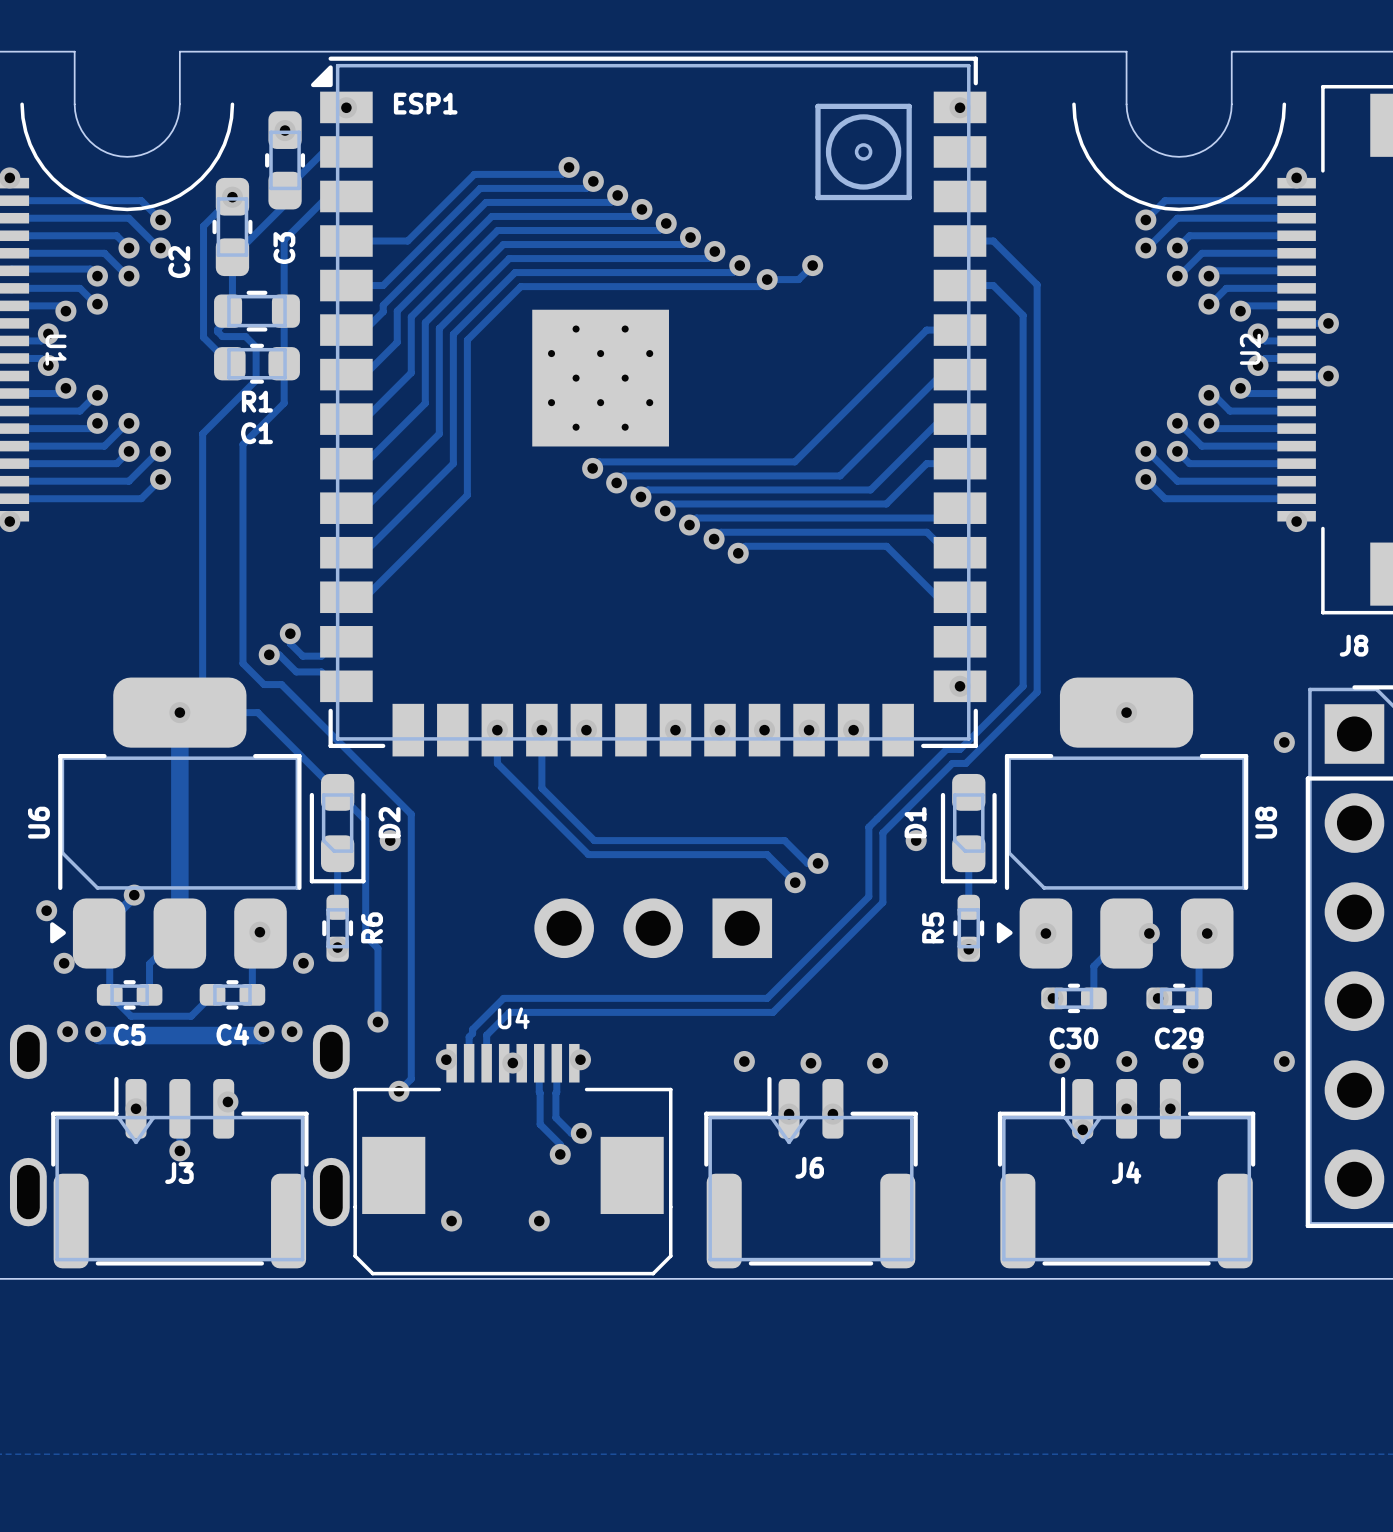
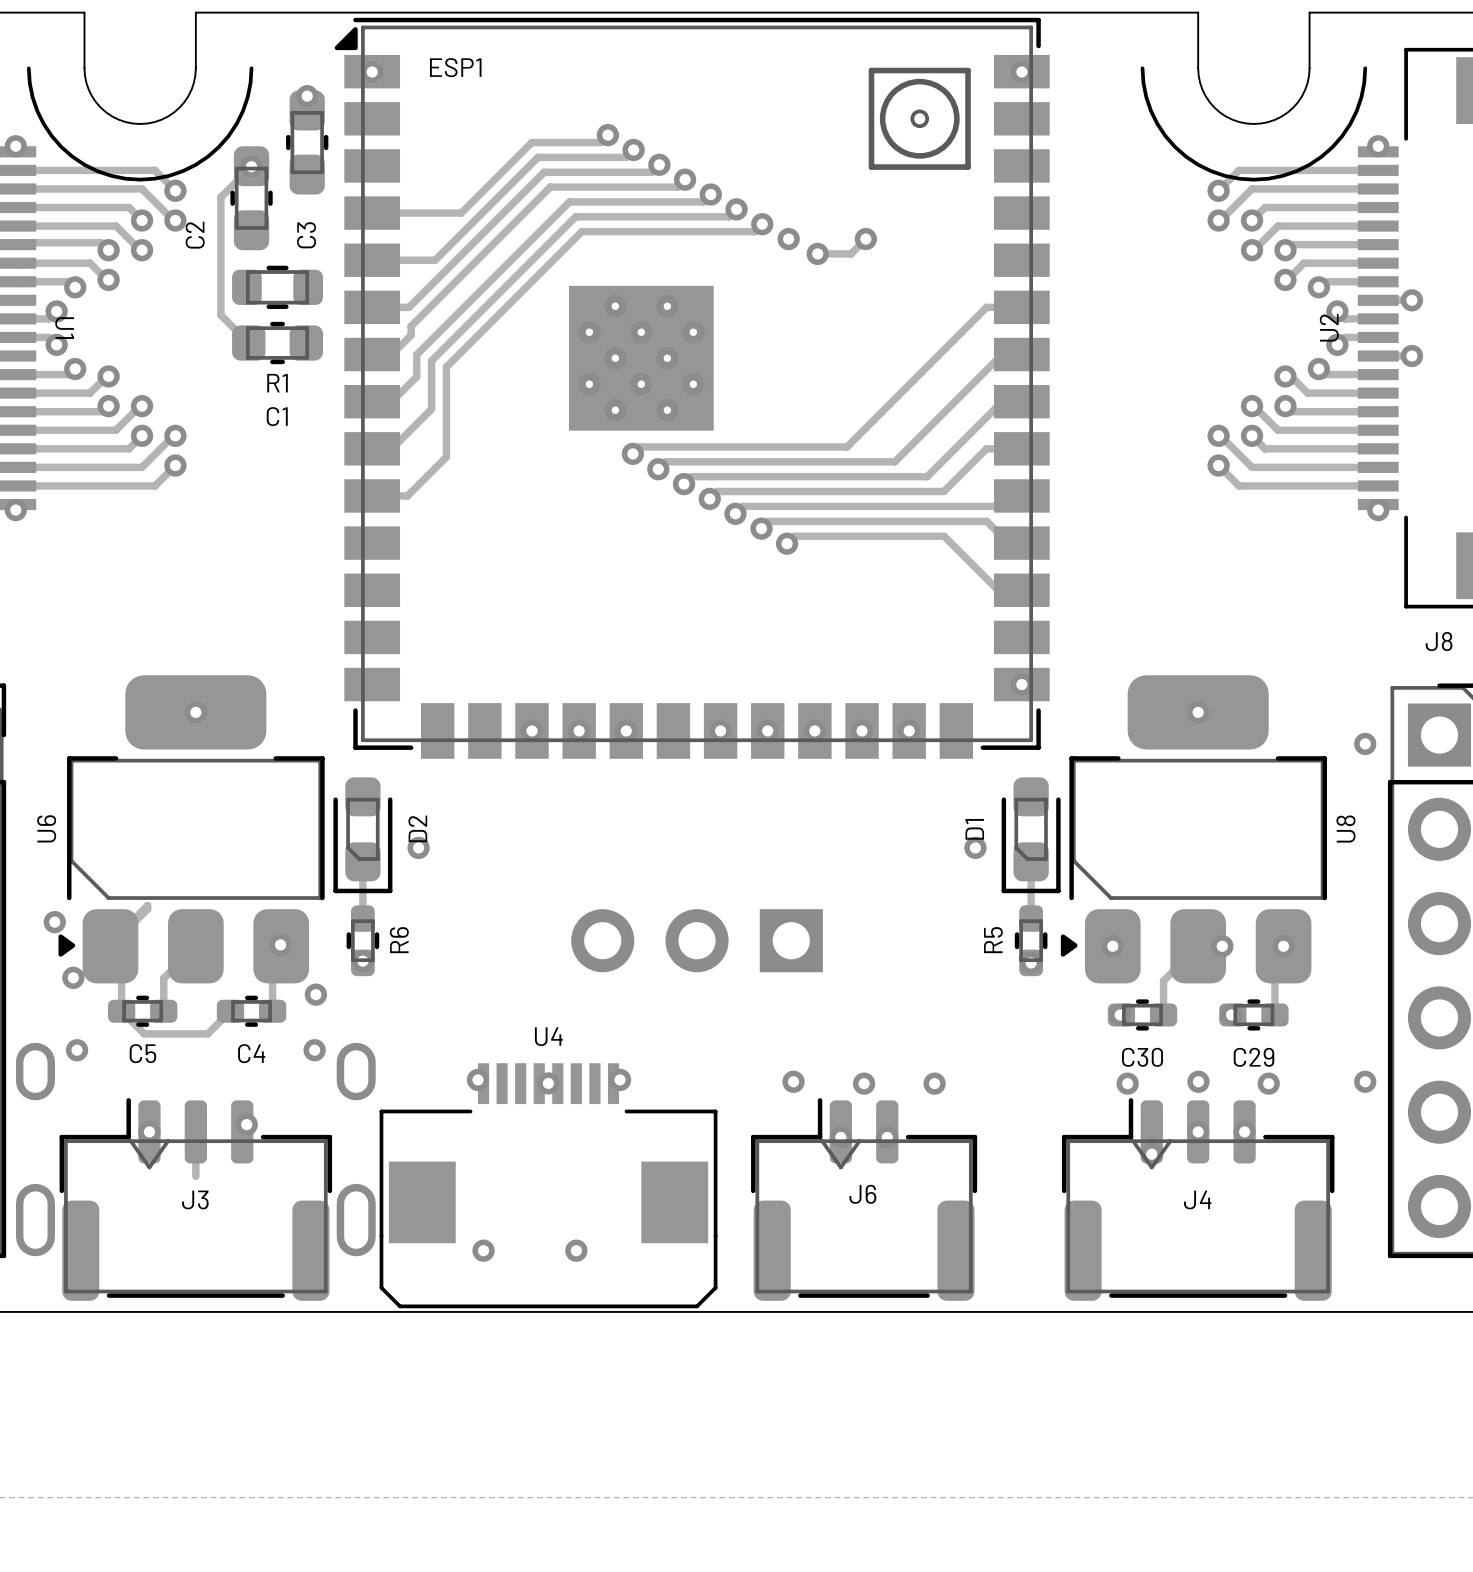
track: (346, 151) (323, 151) (285, 190) (285, 204) (232, 257) (232, 306) (228, 311) (228, 319) (217, 331) (222, 336) (245, 336) (256, 347) (256, 380) (202, 433) (202, 689) (179, 712) -> none
C3 position: (285, 160) -> (307, 142)
track: (497, 174) (474, 174) (407, 241) -> (531, 142) (461, 213) (437, 213)
track: (502, 188) (480, 188) (383, 285) -> (537, 157) (435, 260) (411, 260)
track: (346, 196) (327, 196) (284, 240) (284, 403) (242, 444) (242, 663) (264, 684) (281, 684) (411, 814) (411, 1079) (399, 1091) -> none
track: (508, 202) (486, 202) (383, 305) (383, 311) (364, 330) -> (544, 172) (408, 307) (391, 307)
track: (514, 216) (491, 216) (397, 311) (397, 342) (383, 356) -> (550, 187) (411, 326) (411, 335)
track: (532, 230) (497, 230) (411, 316) (411, 372) (388, 395) -> (569, 201) (416, 354) (416, 376)
track: (960, 241) (993, 241) (1037, 284) (1037, 692) (965, 763) (952, 763) (882, 832) (882, 902) (772, 1012) (509, 1012) (486, 1035) (486, 1063) -> none
track: (538, 244) (503, 244) (425, 322) (425, 403) (402, 426) -> (575, 216) (431, 360) (431, 409)
track: (544, 258) (509, 258) (439, 328) (439, 433) (364, 508) -> (581, 231) (446, 367) (446, 456) (407, 495) (391, 495)
track: (739, 265) (732, 272) (515, 272) (453, 334) (453, 463) (364, 552) (346, 552) -> none
track: (767, 279) (760, 286) (520, 286) (467, 340) (467, 495) (365, 597) (346, 597) -> none
track: (960, 285) (993, 285) (1023, 315) (1023, 686) (960, 749) (946, 749) (868, 827) (868, 896) (767, 998) (503, 998) (472, 1029) (472, 1033) (469, 1036) (469, 1063) -> none
track: (290, 633) (290, 643) (302, 656) (321, 656) (335, 641) (346, 641) -> none
via: (290, 633) -> none
track: (269, 654) (279, 654) (296, 671) (321, 671) (335, 686) (346, 686) -> none
via: (269, 654) -> none
track: (179, 712) (257, 712) (365, 820) (365, 936) (377, 948) (377, 1022) -> none
track: (179, 712) (179, 933) -> none
track: (497, 730) (497, 763) (588, 854) (767, 854) (795, 882) -> none
track: (541, 730) (541, 788) (594, 840) (784, 840) (807, 863) (818, 863) -> none
via: (818, 863) -> none
via: (795, 882) -> none
via: (134, 895) -> none
via position: (303, 963) -> (315, 994)
via: (377, 1022) -> none
track: (95, 1031) (99, 1035) (260, 1035) (264, 1031) -> none
via: (95, 1031) -> none
via: (264, 1031) -> none
track: (539, 1063) (540, 1124) (560, 1144) (560, 1154) -> none
track: (556, 1063) (555, 1117) (571, 1133) (581, 1133) -> none
via: (399, 1091) -> none
via: (581, 1133) -> none
via: (179, 1150) -> none
via: (560, 1154) -> none

